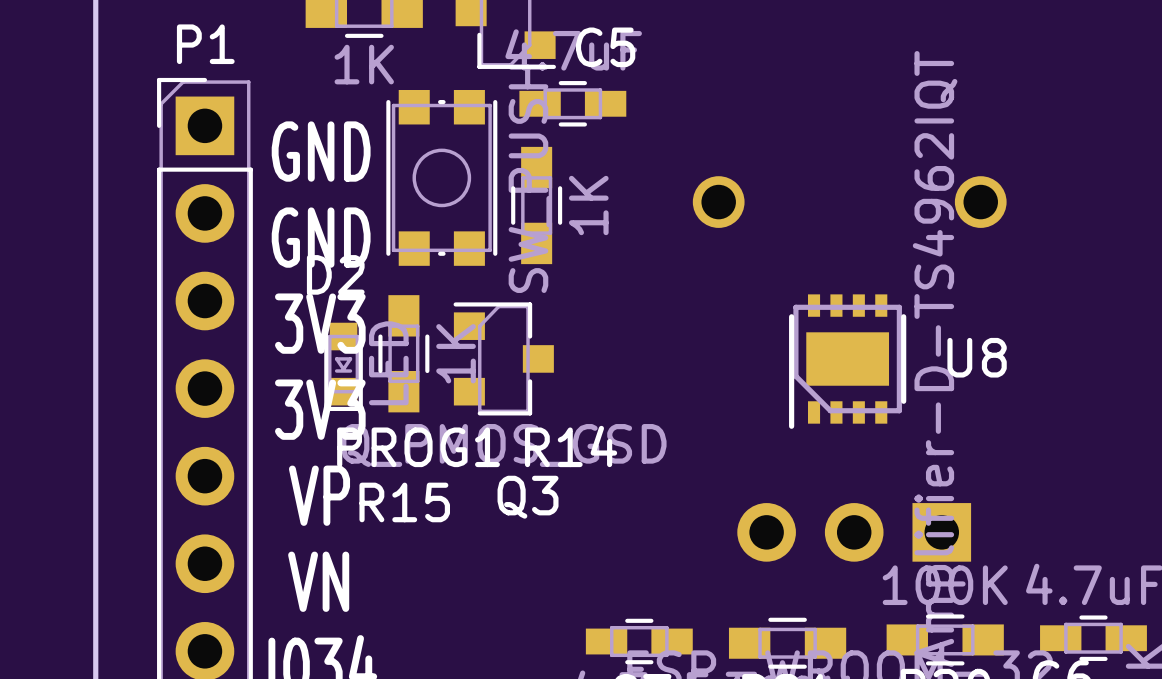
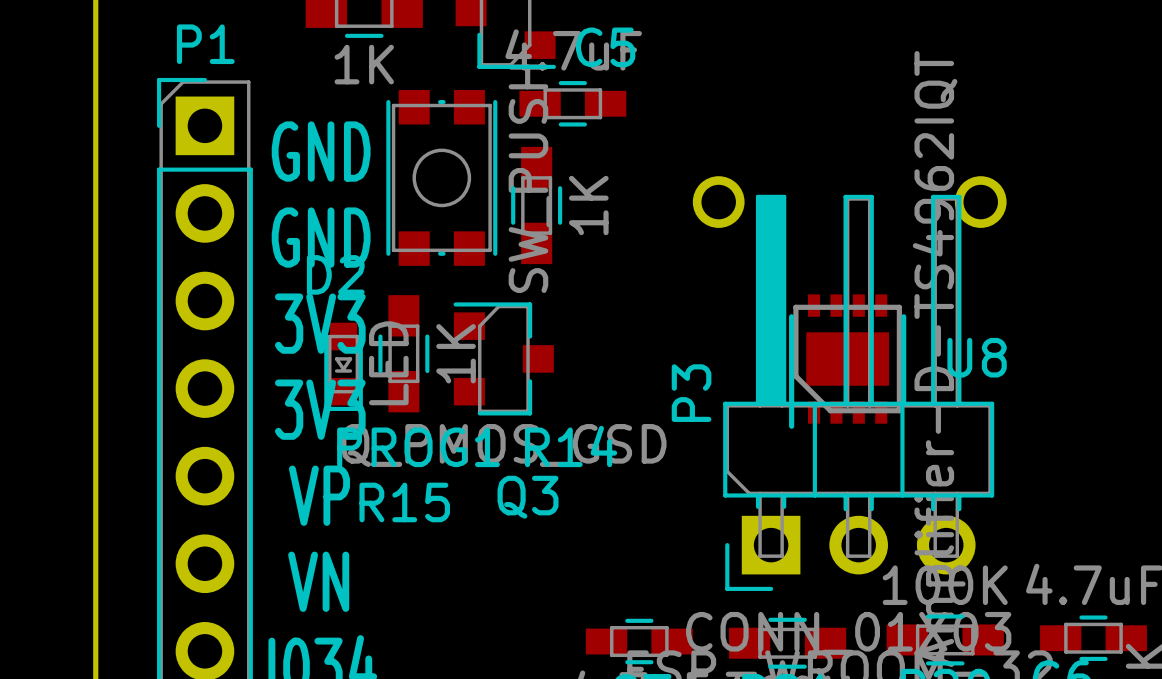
P3 side: bottom (854, 532) -> top (858, 392)

